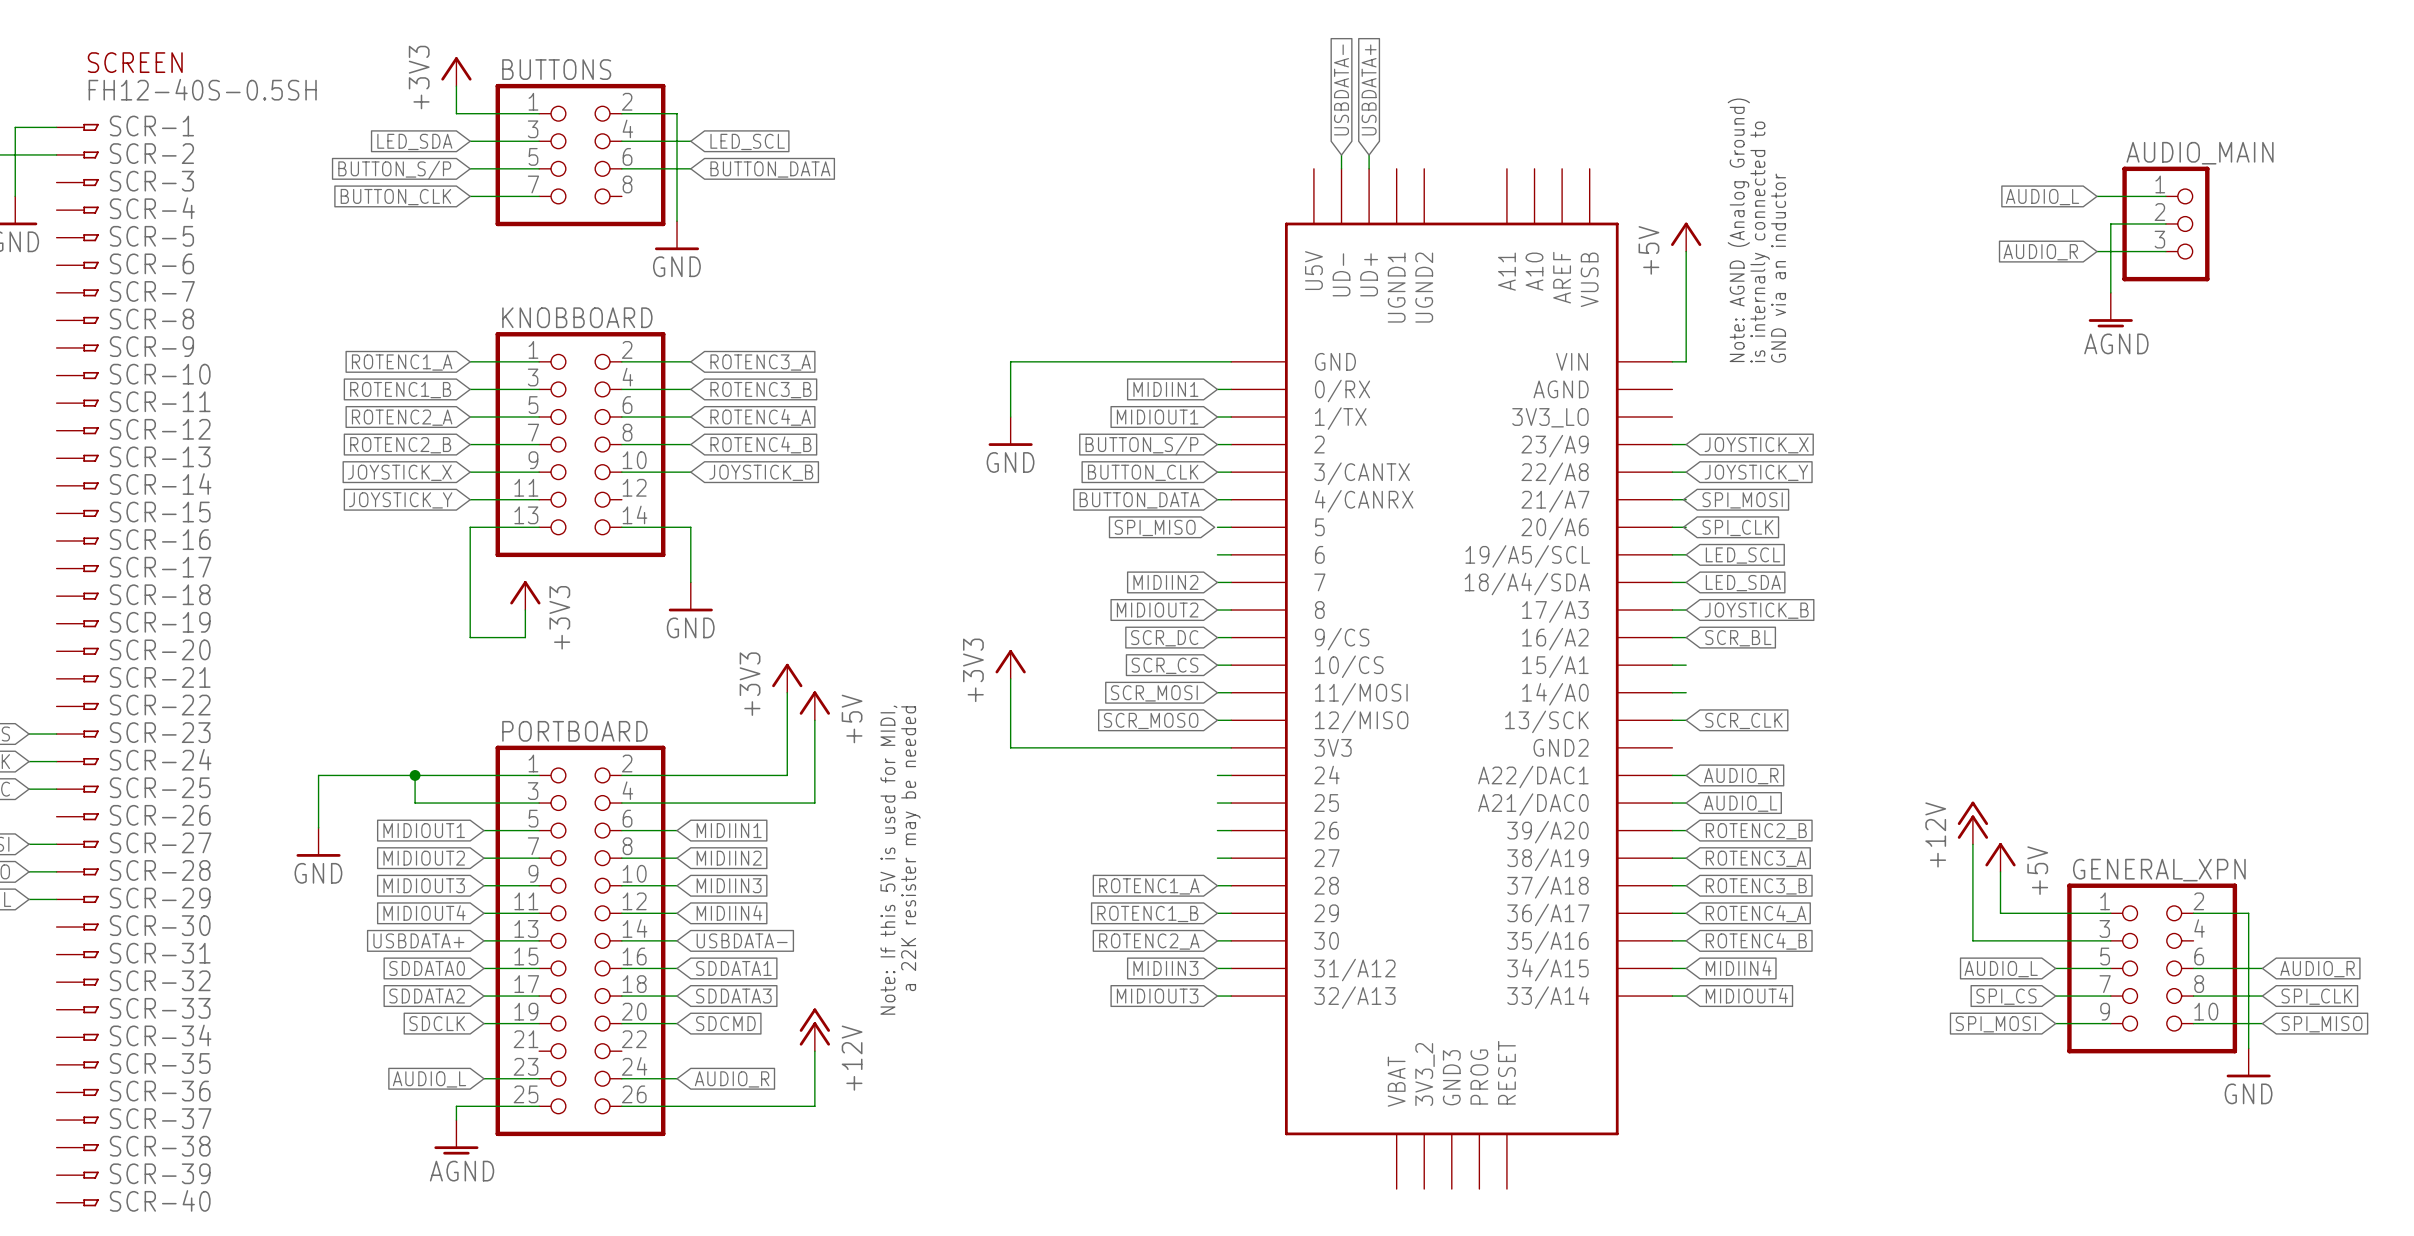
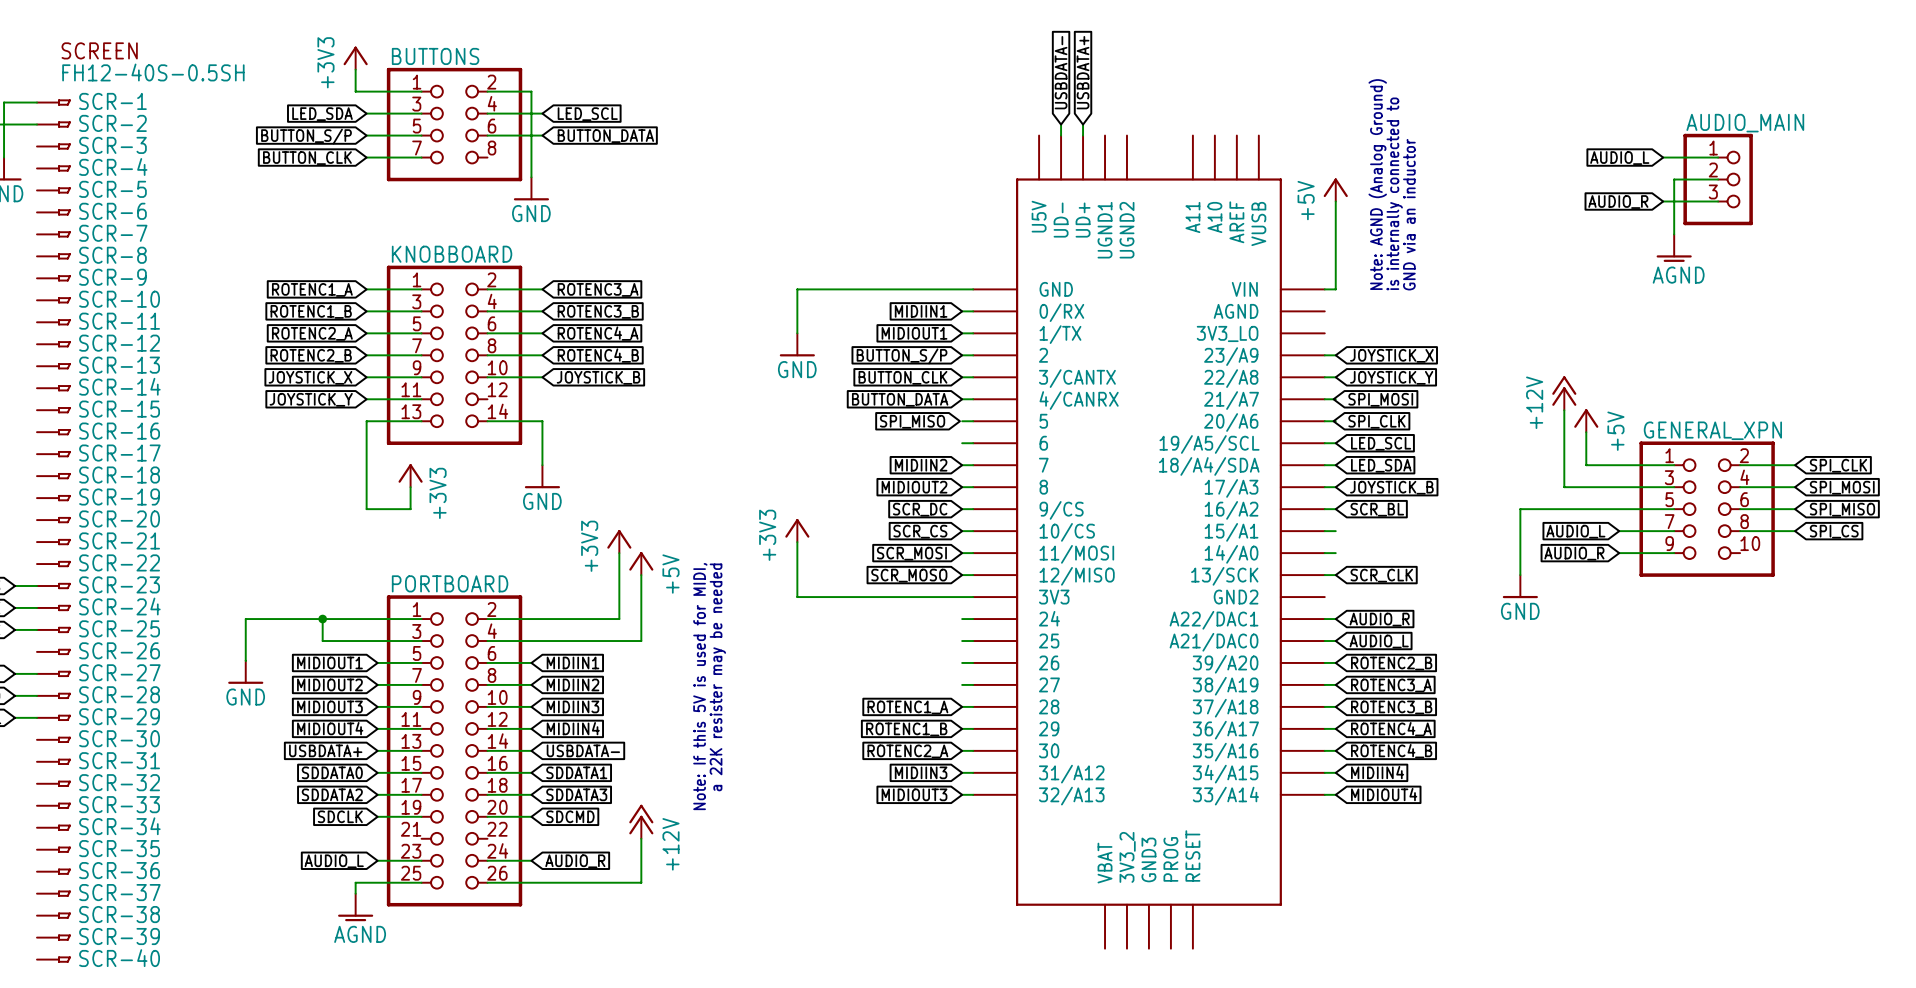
power symbol: none -> +12V (1564, 393)
wire: none -> (1564, 410) (1564, 487) (1674, 487)
power symbol: none -> +5V (1586, 420)
wire: none -> (1586, 432) (1586, 465) (1674, 465)
wire: none -> (1740, 465) (1795, 465)
global label: none -> SPI_CLK (1838, 465)
wire: none -> (1740, 487) (1795, 487)
global label: none -> SPI_MOSI (1842, 487)
wire: none -> (1674, 509) (1520, 509) (1520, 575)
GENERAL_XPN: none -> (1707, 509)
wire: none -> (1740, 509) (1795, 509)
global label: none -> SPI_MISO (1842, 509)
global label: none -> AUDIO_L (1575, 531)
wire: none -> (1619, 531) (1674, 531)
wire: none -> (1740, 531) (1795, 531)
global label: none -> SPI_CS (1834, 531)
wire: none -> (1619, 553) (1674, 553)
global label: none -> AUDIO_R (1574, 553)
power symbol: none -> GND (1520, 586)
power symbol: +12V (1972, 823) -> none
wire: (1972, 844) (1972, 940) (2110, 940) -> none
power symbol: +5V (2000, 857) -> none
wire: (2000, 871) (2000, 913) (2110, 913) -> none
wire: (2193, 913) (2248, 913) (2248, 1048) -> none
wire: (2055, 968) (2110, 968) -> none
GENERAL_XPN: (2152, 968) -> none
wire: (2193, 968) (2262, 968) -> none
global label: AUDIO_L (2001, 969) -> none
global label: AUDIO_R (2317, 969) -> none
global label: SPI_CS (2006, 996) -> none
wire: (2055, 996) (2110, 996) -> none
wire: (2193, 996) (2262, 996) -> none
global label: SPI_CLK (2316, 996) -> none
wire: (2055, 1023) (2110, 1023) -> none
wire: (2193, 1023) (2262, 1023) -> none
global label: SPI_MOSI (1995, 1024) -> none
global label: SPI_MISO (2321, 1024) -> none
power symbol: GND (2248, 1062) -> none

